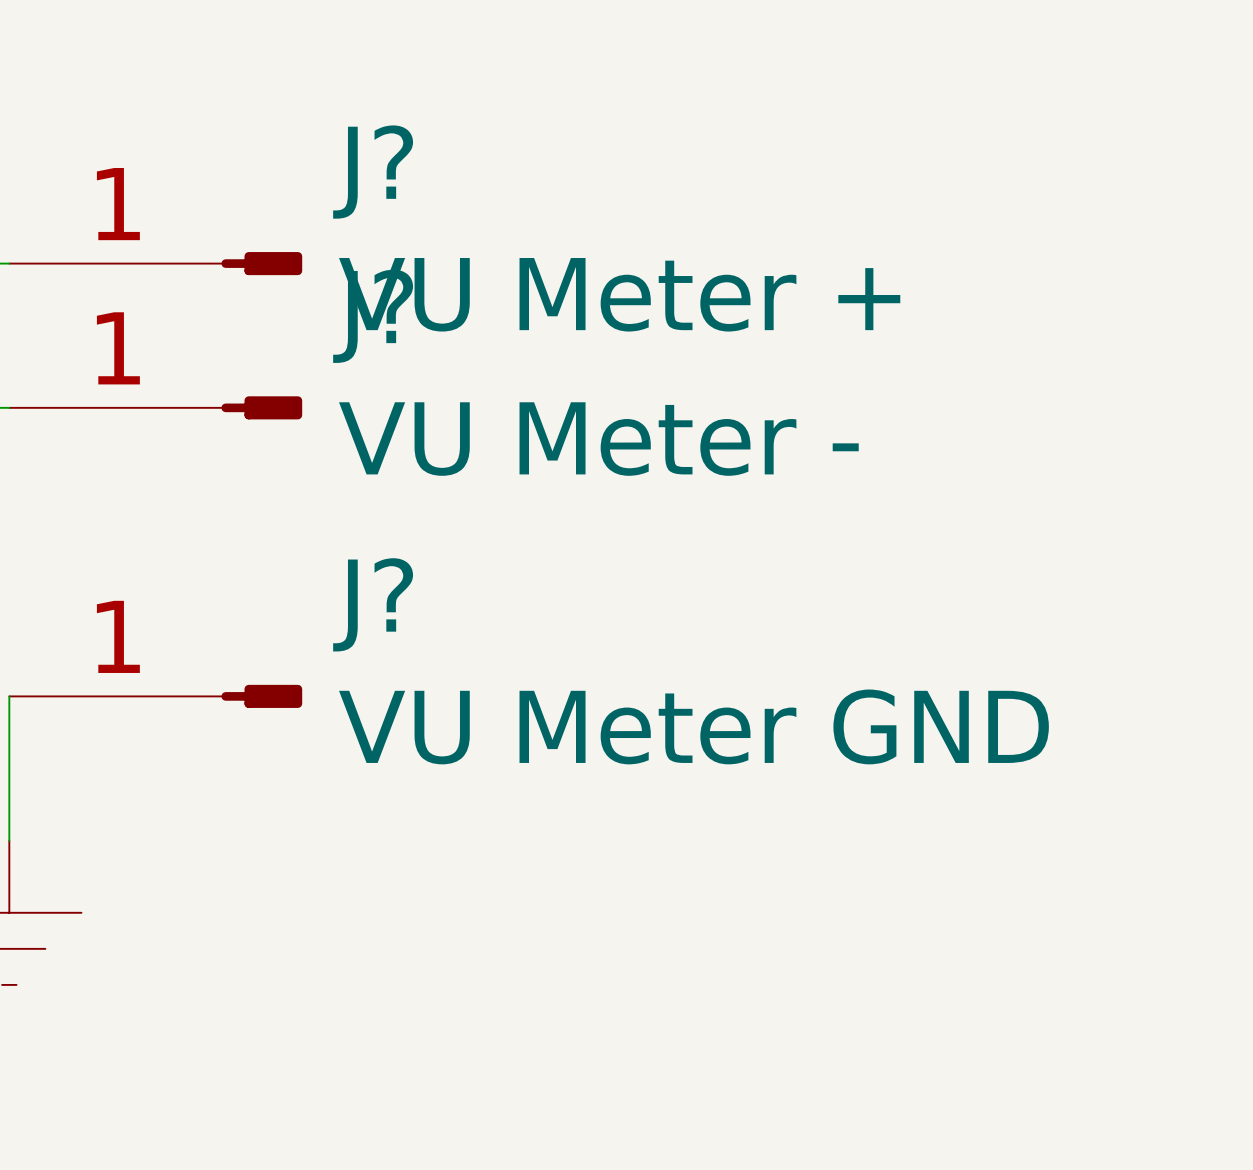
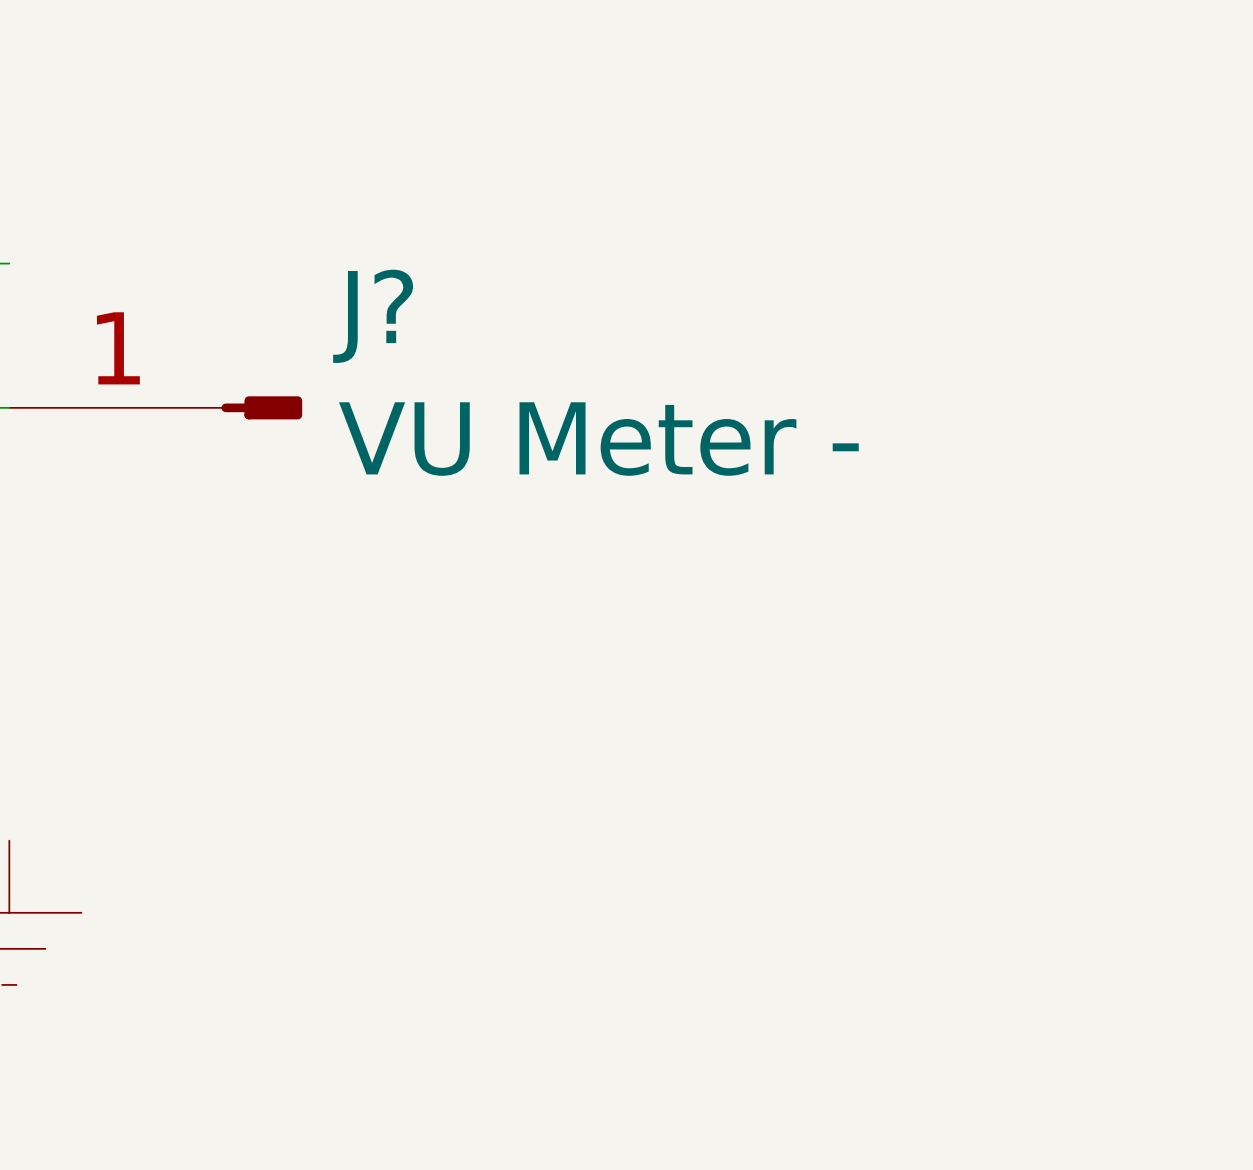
J?: VU Meter + (155, 263) -> none
wire: (9, 696) (9, 840) -> none
J?: VU Meter GND (155, 696) -> none

